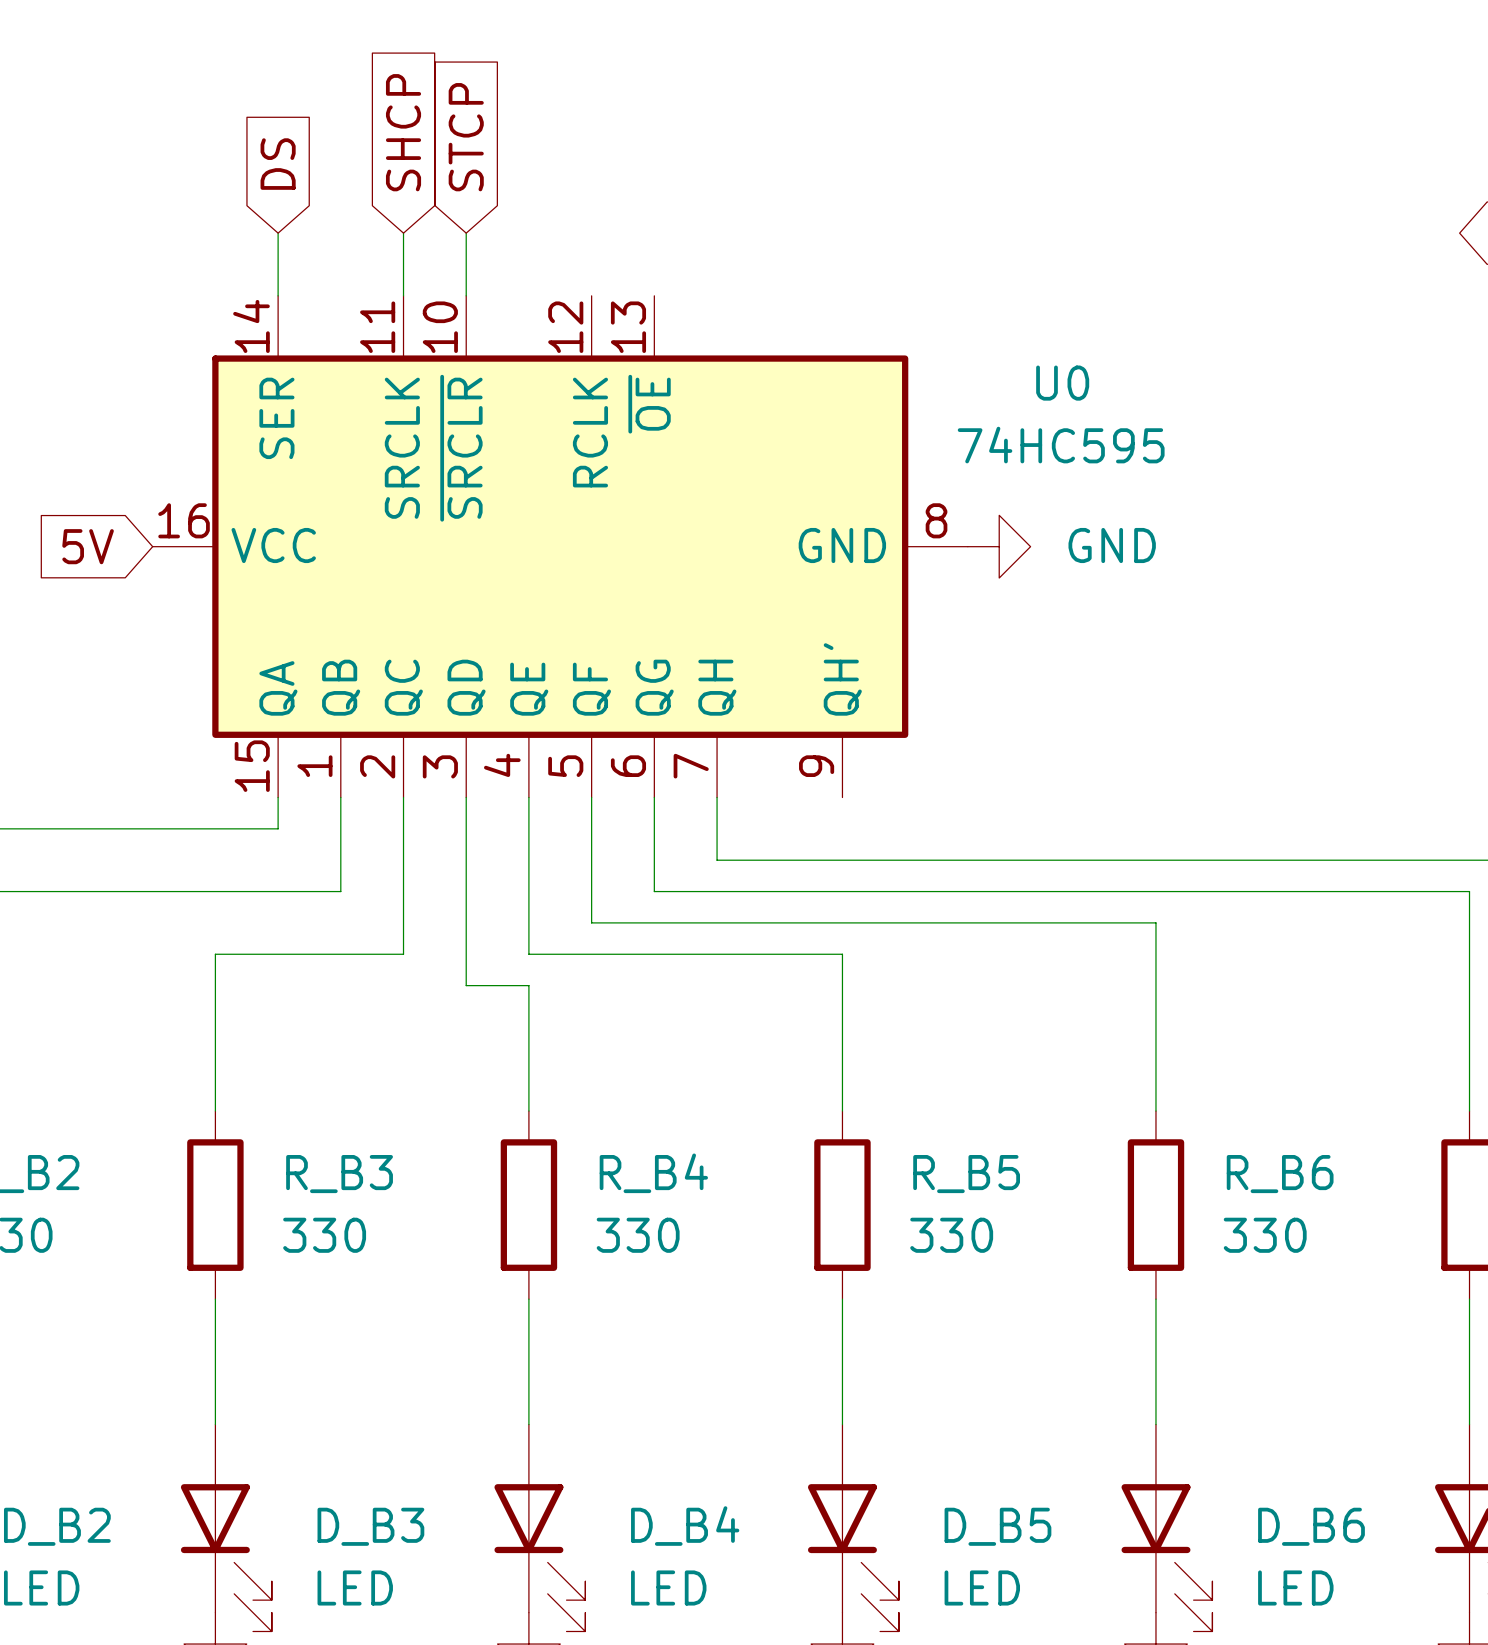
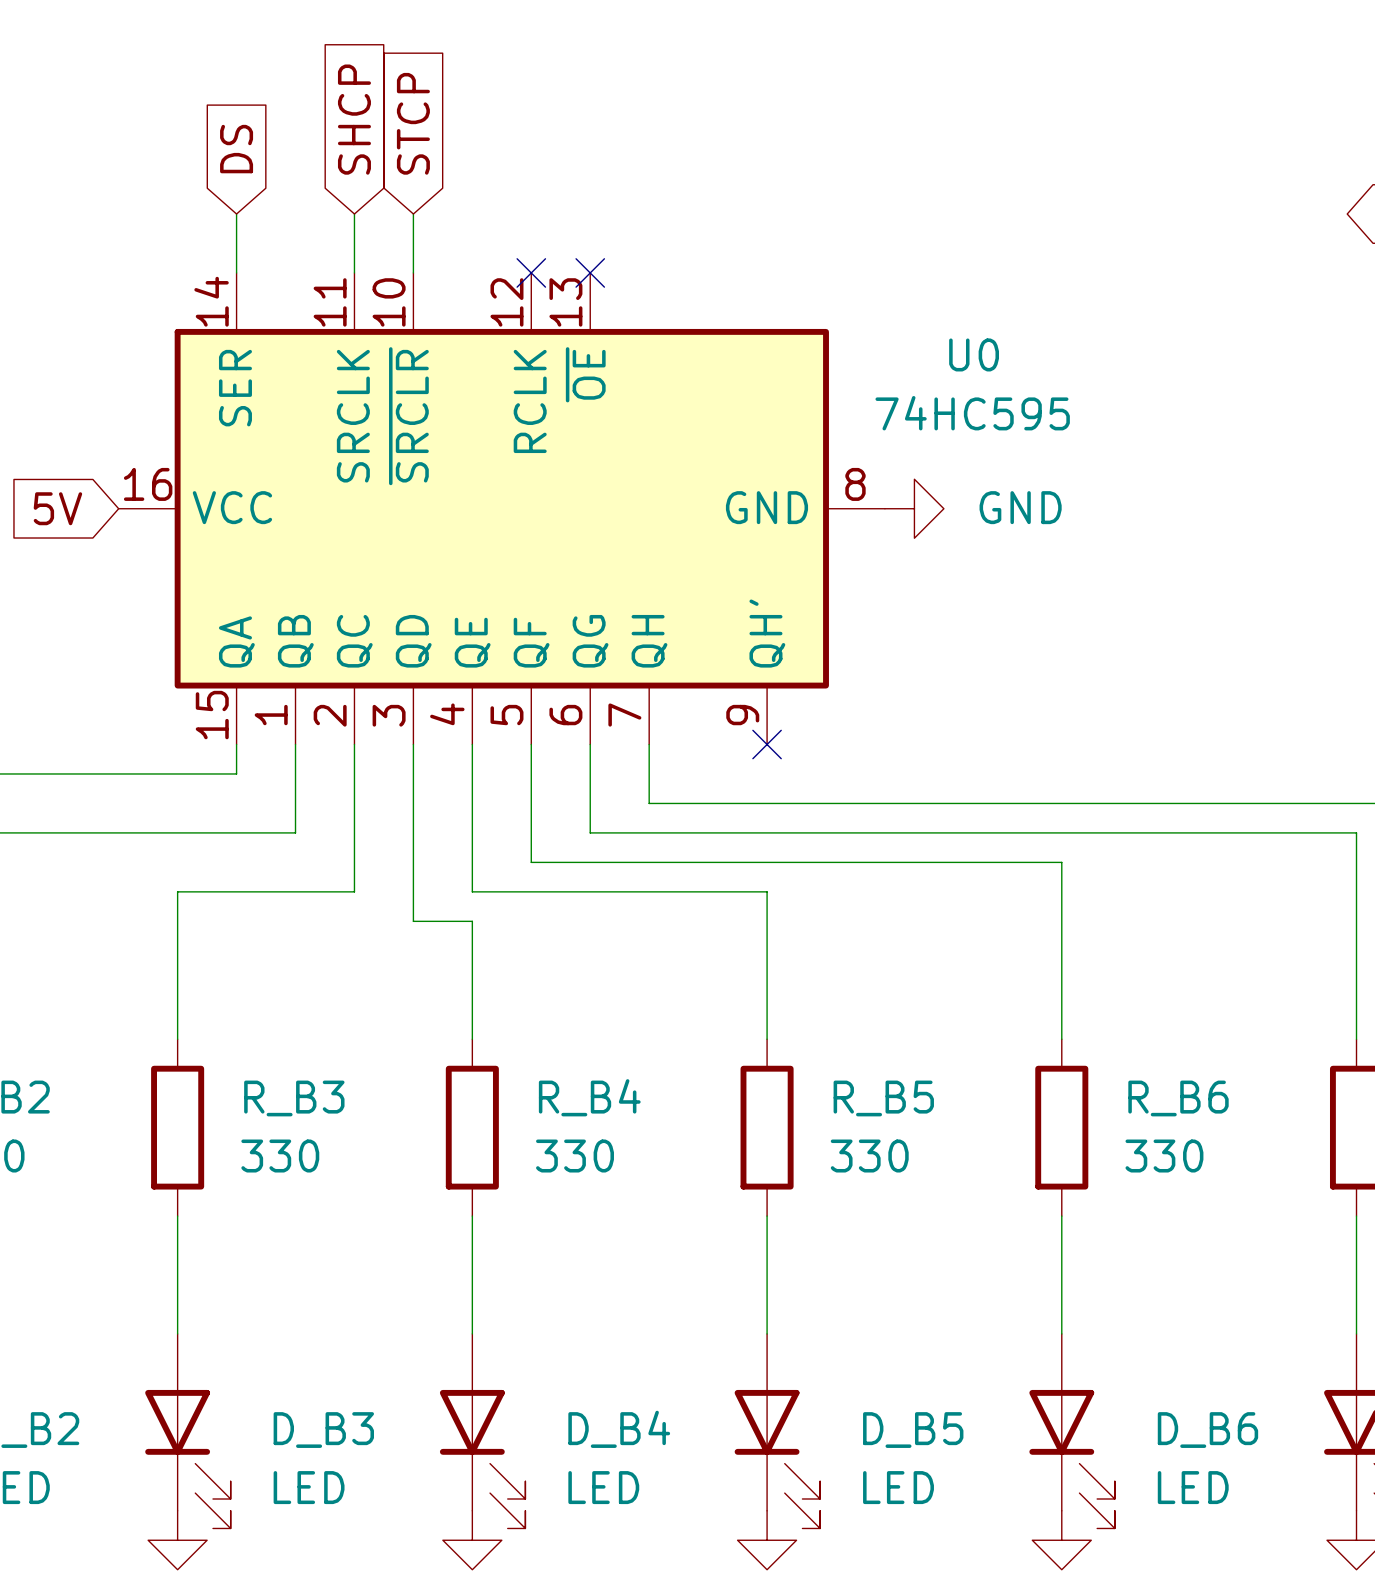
no-connect mark: none -> (531, 272)
no-connect mark: none -> (590, 272)
no-connect mark: none -> (767, 744)

